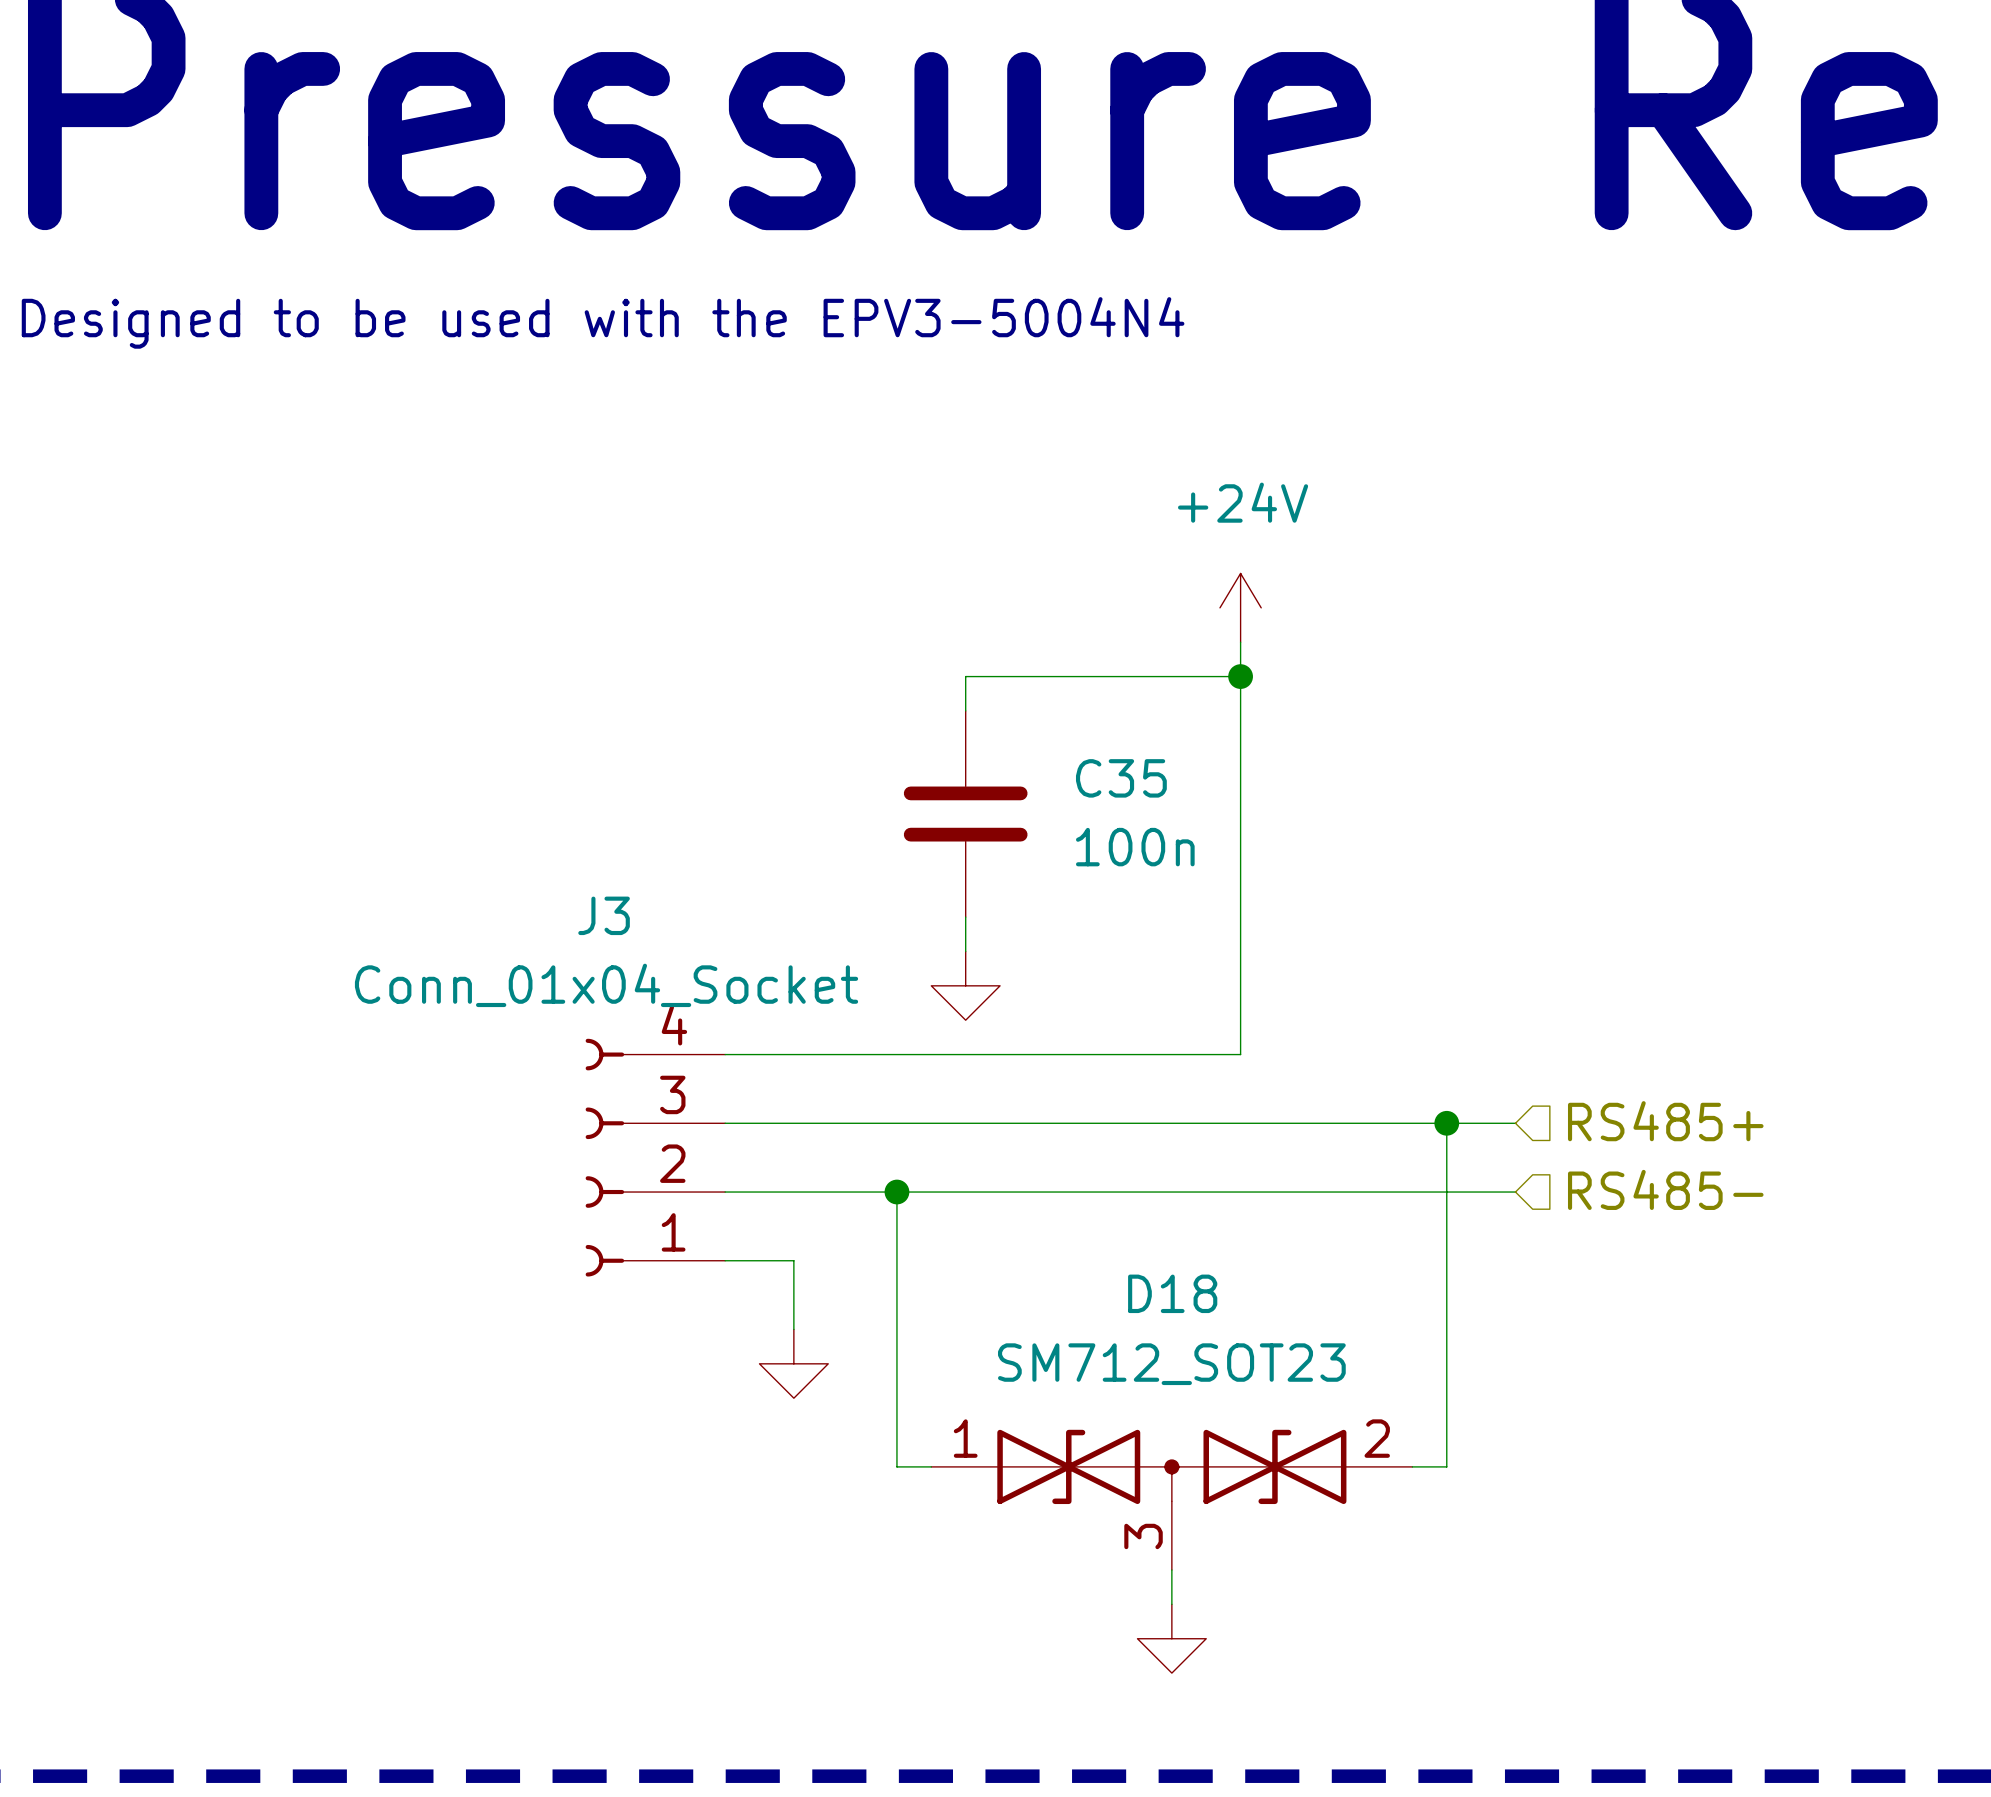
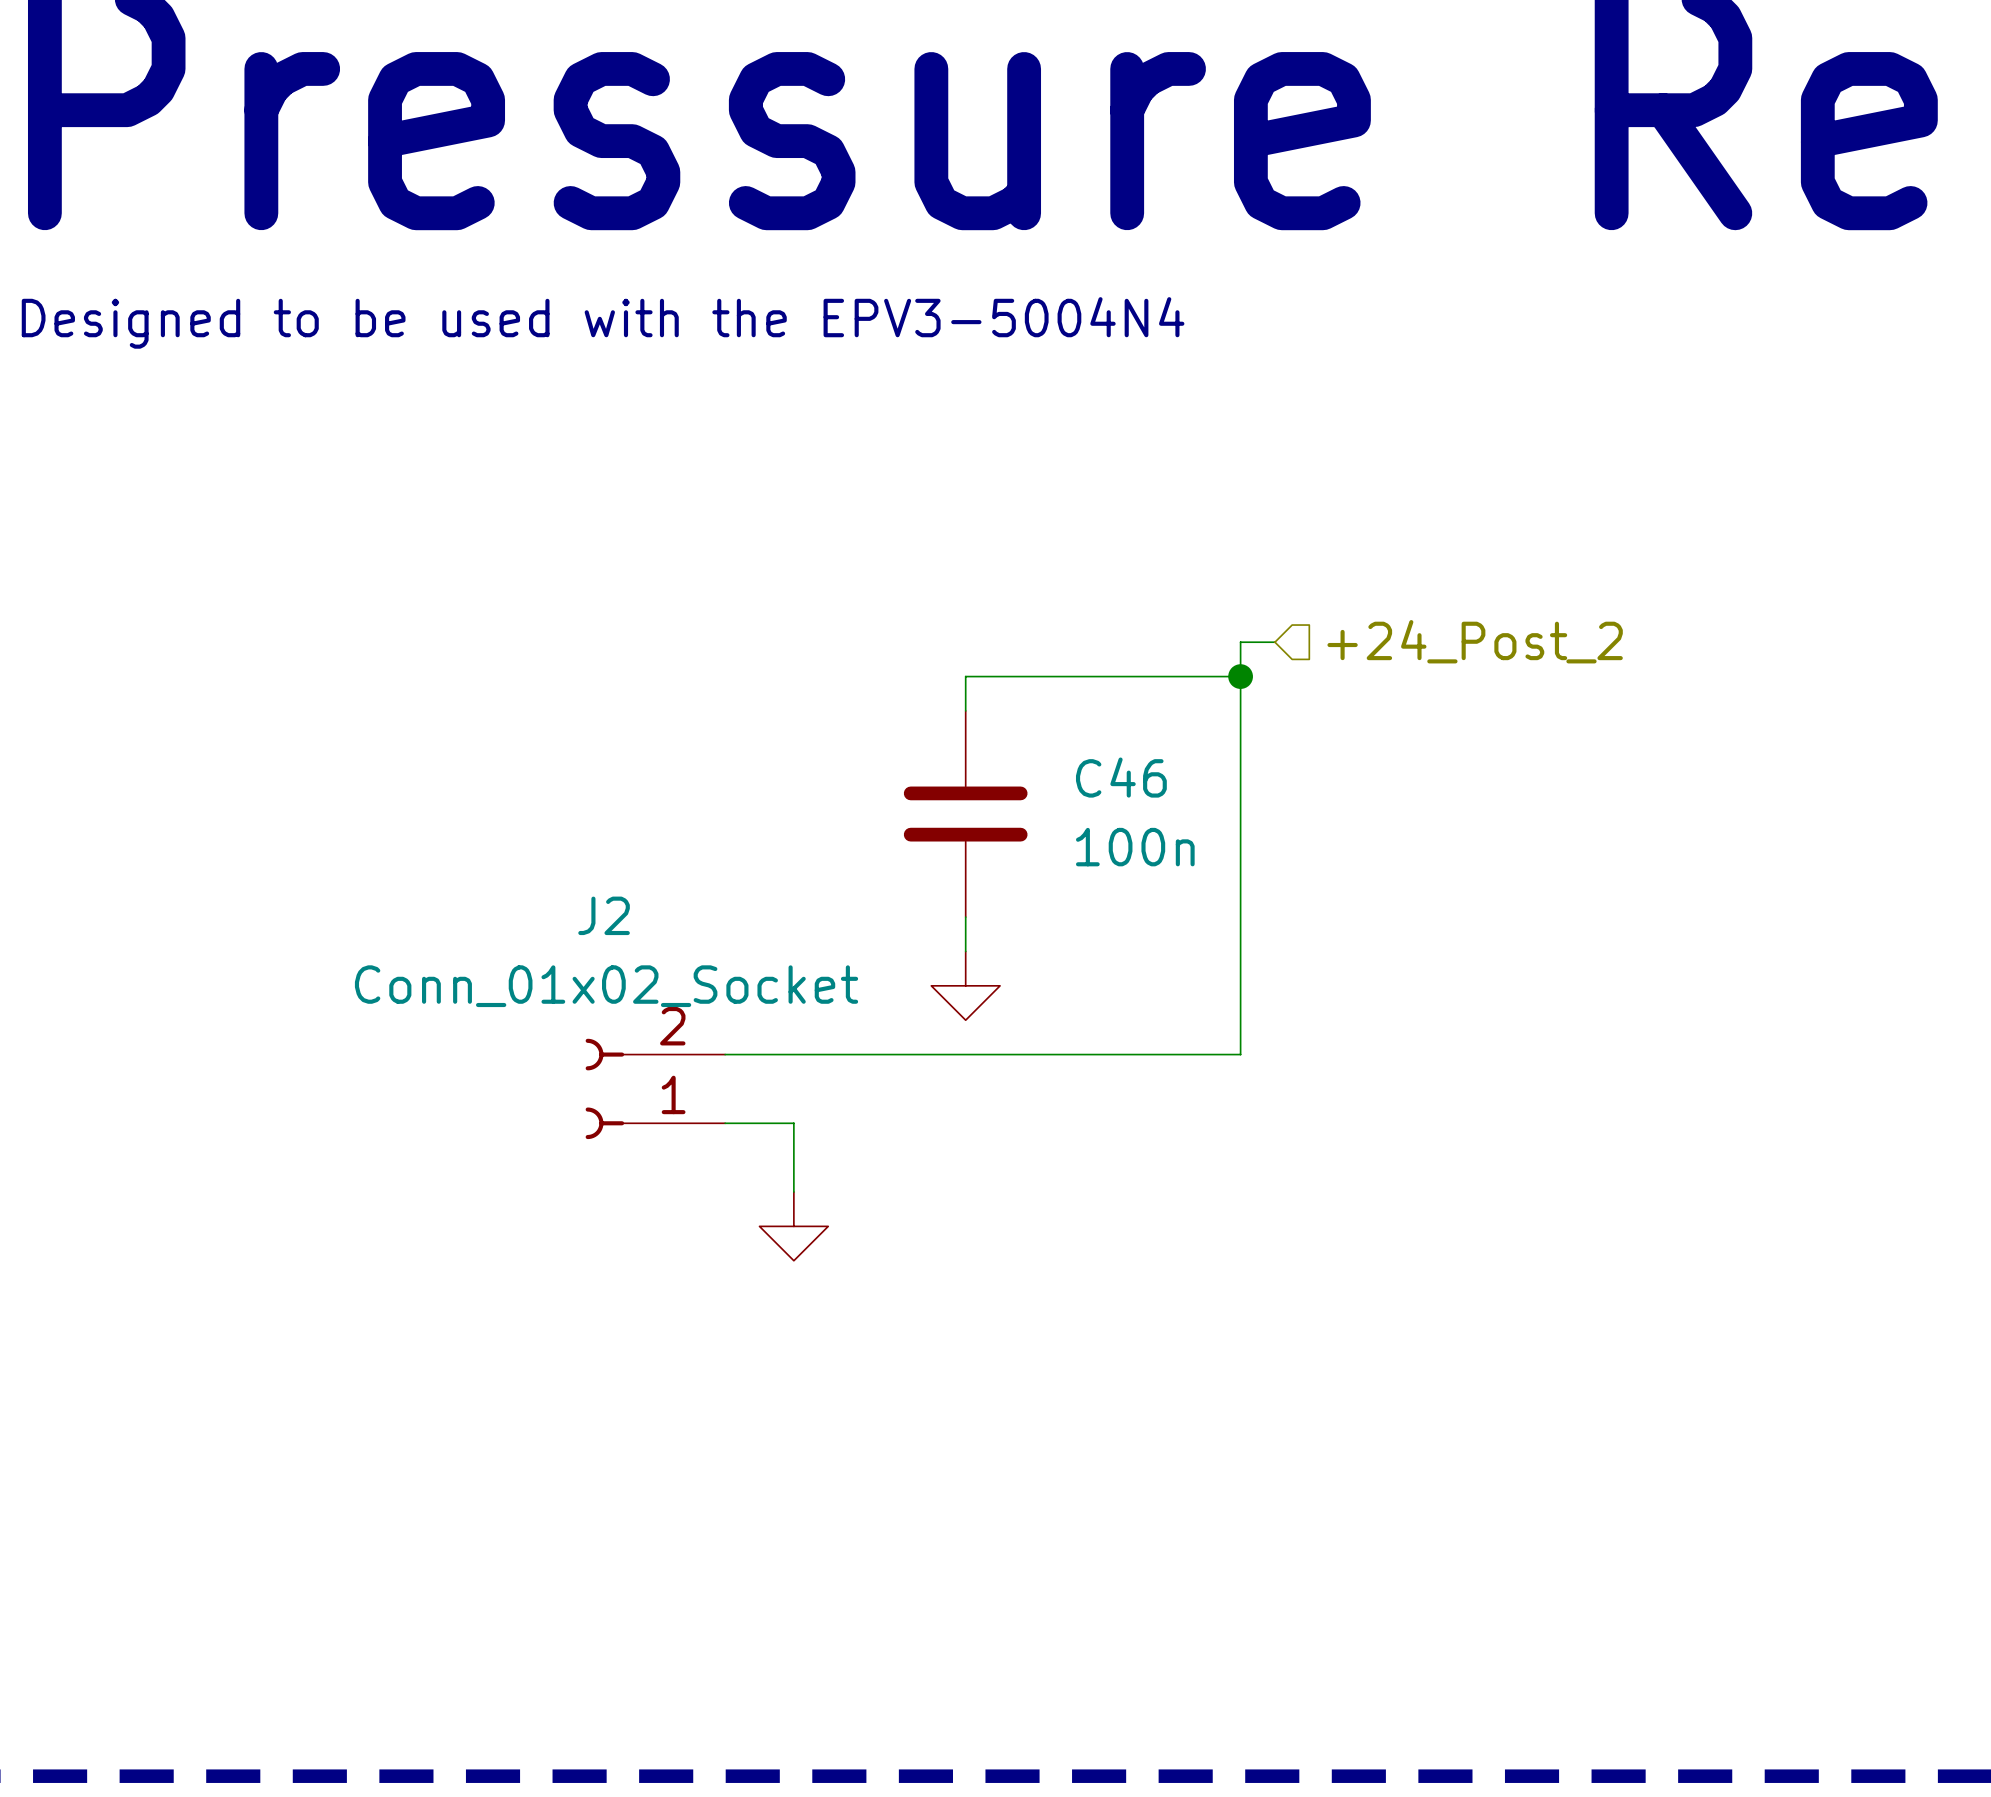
power symbol: +24V (1240, 607) -> none
hierarchical label: none -> +24_Post_2 (1475, 641)
wire: none -> (1240, 642) (1274, 642)
C35 name: C35 (1121, 778) -> C46 (1121, 777)
J2: none -> Conn_01x02_Socket (655, 1088)
hierarchical label: RS485+ (1665, 1121) -> none
wire: (793, 1123) (1515, 1123) -> (793, 1123) (793, 1192)
wire: (1446, 1123) (1446, 1466) (1412, 1466) -> none
junction: (1446, 1123) -> none
J3: Conn_01x04_Socket (655, 1157) -> none
hierarchical label: RS485- (1665, 1189) -> none
wire: (725, 1192) (1515, 1192) -> none
wire: (896, 1192) (896, 1466) (931, 1466) -> none
junction: (896, 1192) -> none
wire: (725, 1260) (793, 1260) (793, 1329) -> none
power symbol position: (793, 1363) -> (793, 1226)
D18: SM712_SOT23 (1171, 1499) -> none
wire: (1171, 1570) (1171, 1604) -> none
power symbol: (1171, 1638) -> none

